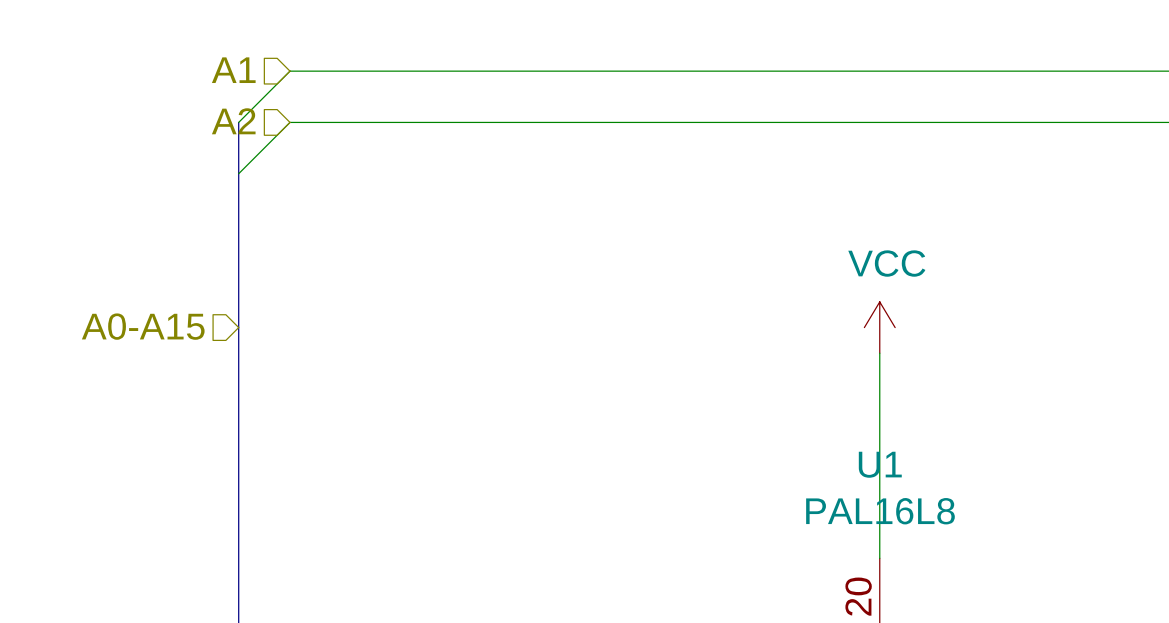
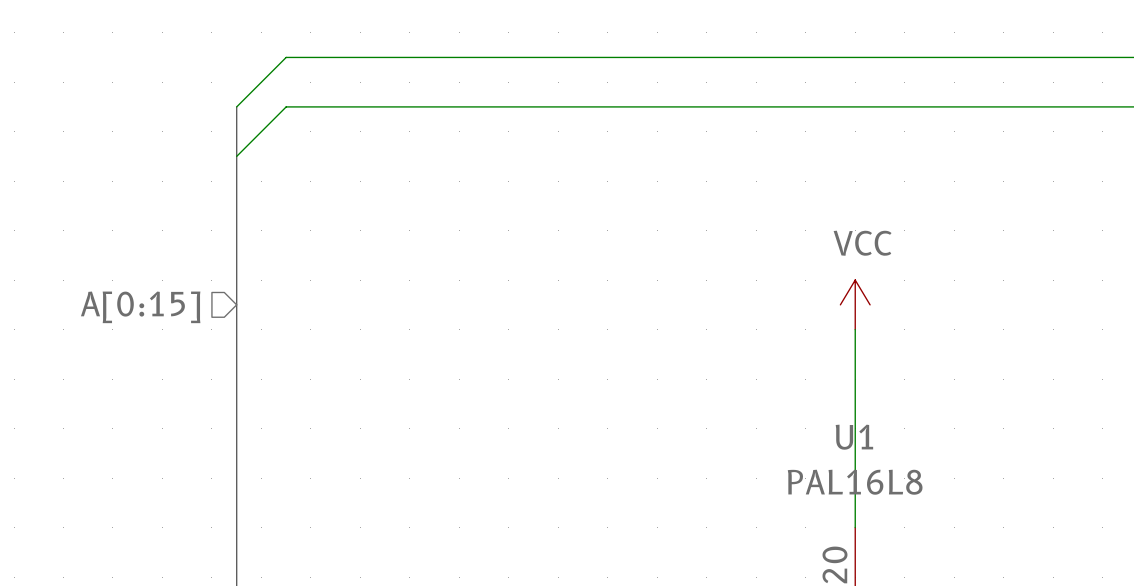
hierarchical label: A1 (233, 70) -> none
hierarchical label: A2 (233, 121) -> none
hierarchical label: A0-A15 (143, 326) -> A[0:15] (140, 307)

